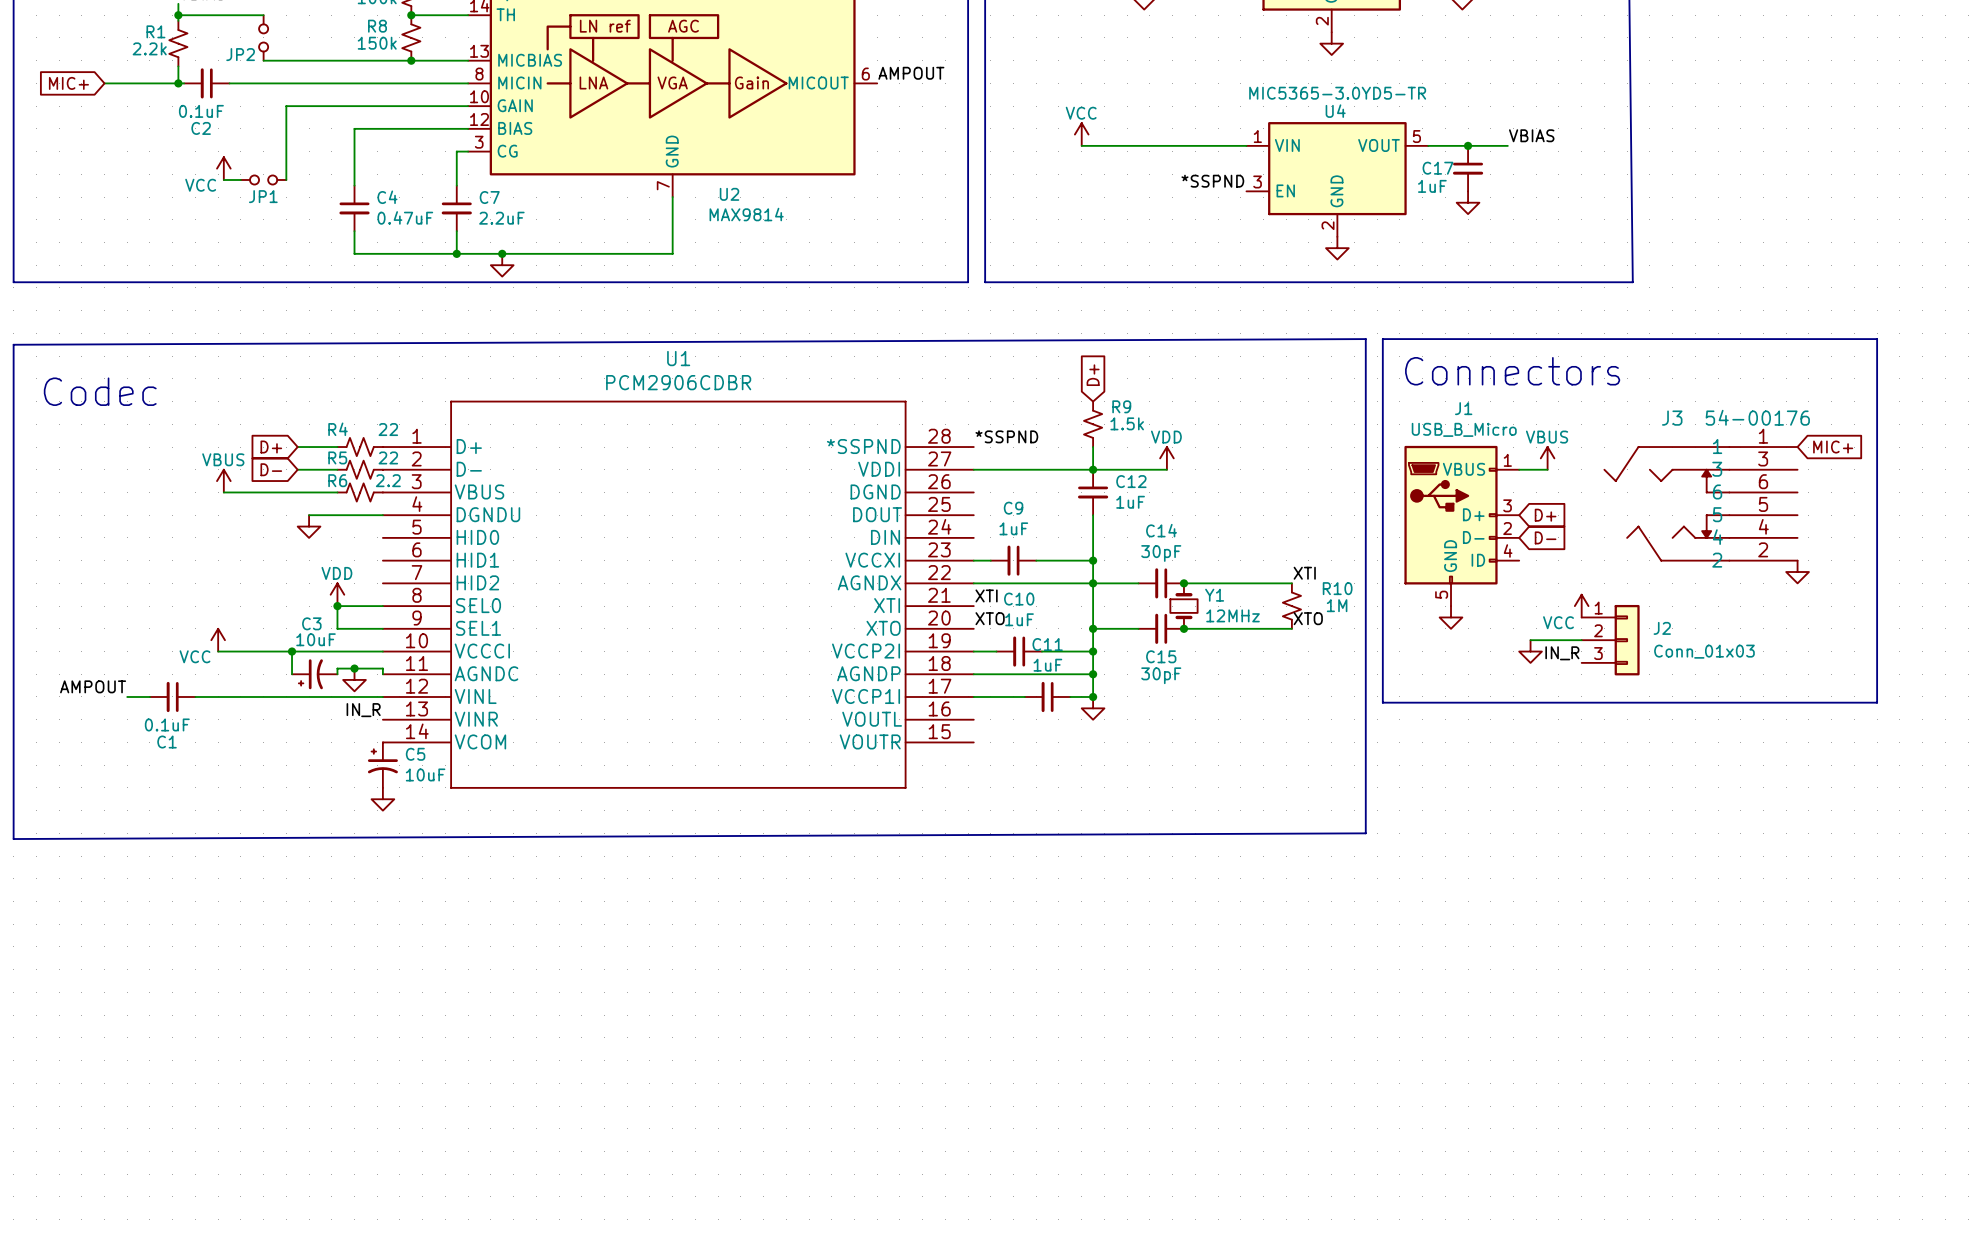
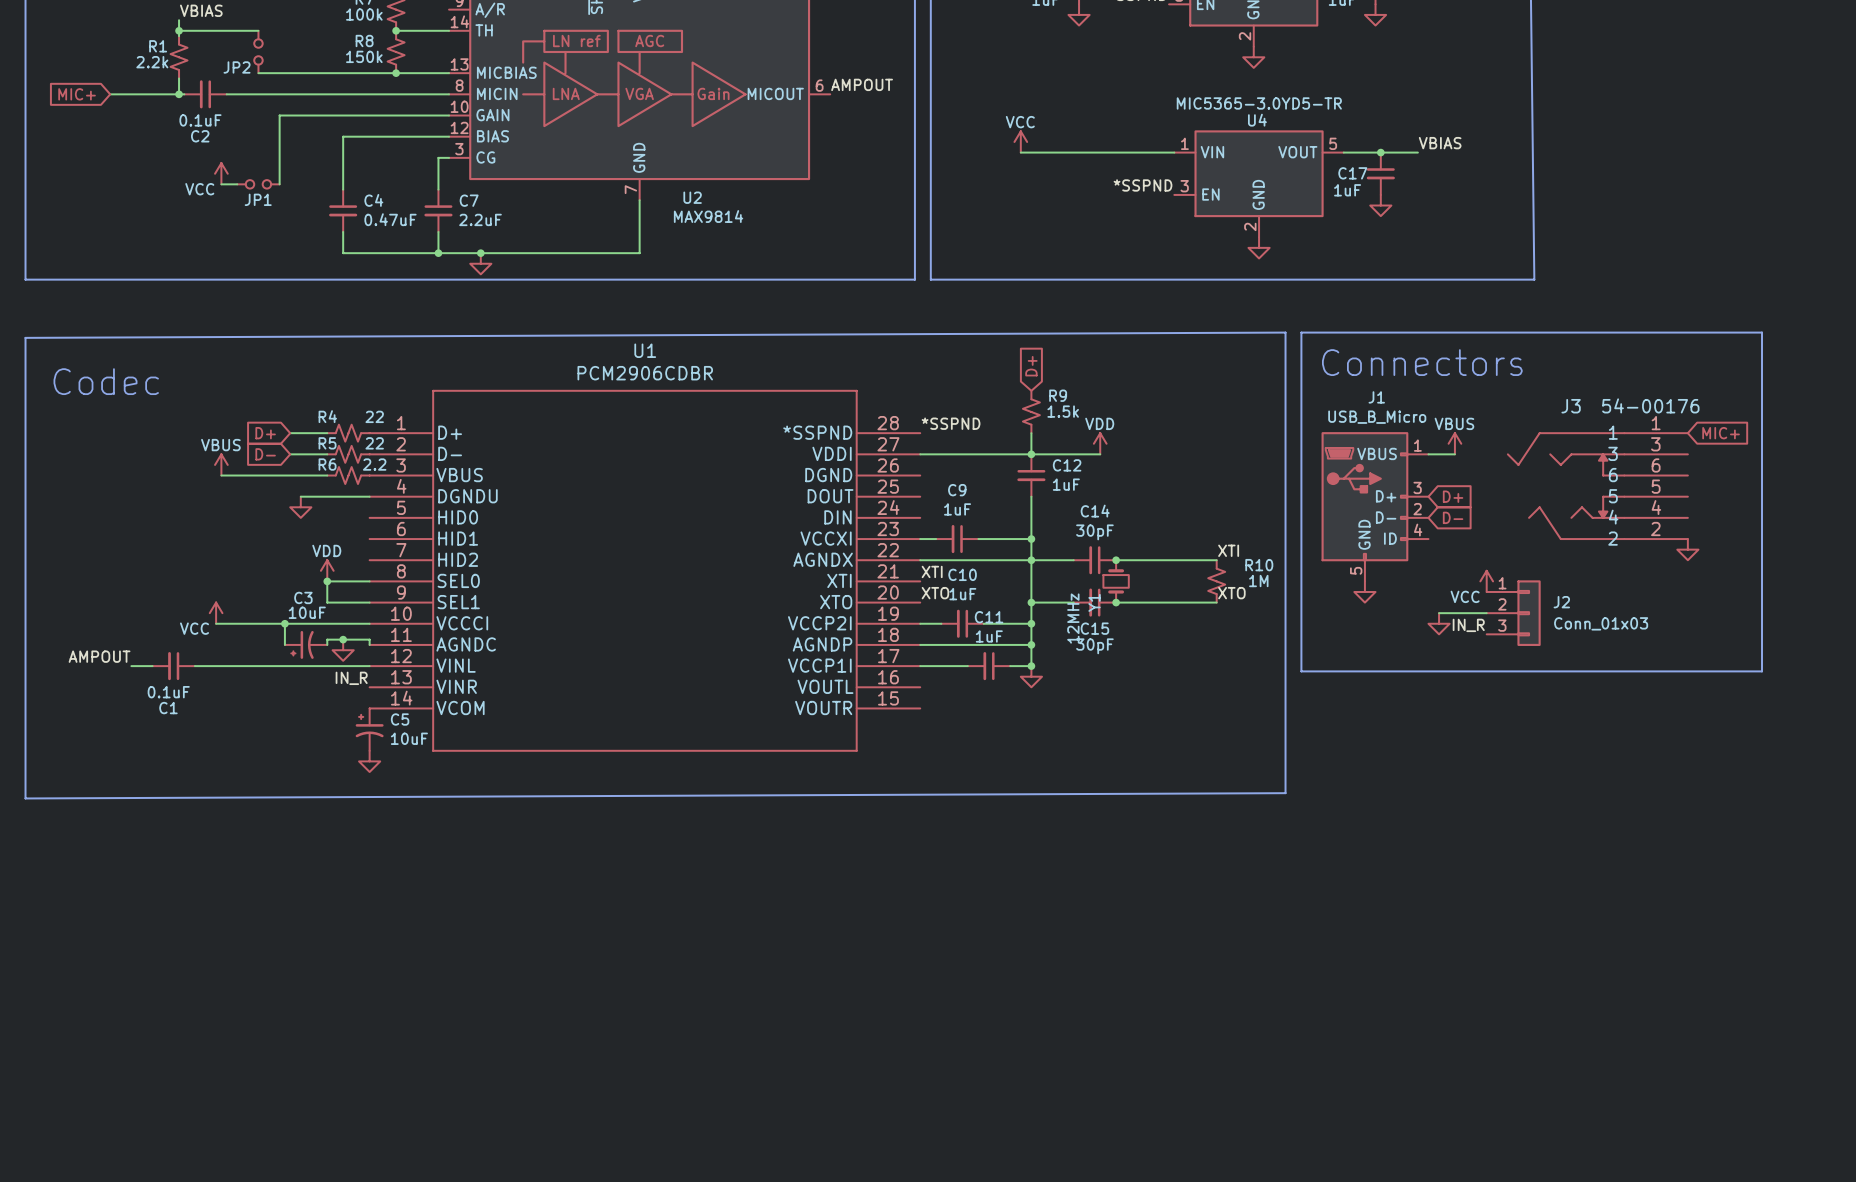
Y1 name rotation: 0° (1214, 595) -> 90° counterclockwise (1094, 602)
Y1 name position: Y1 (1214, 595) -> Y1 (1094, 602)
Y1 value rotation: 0° (1233, 615) -> 90° counterclockwise (1073, 618)
Y1 value position: 12MHz (1233, 615) -> 12MHz (1073, 618)

